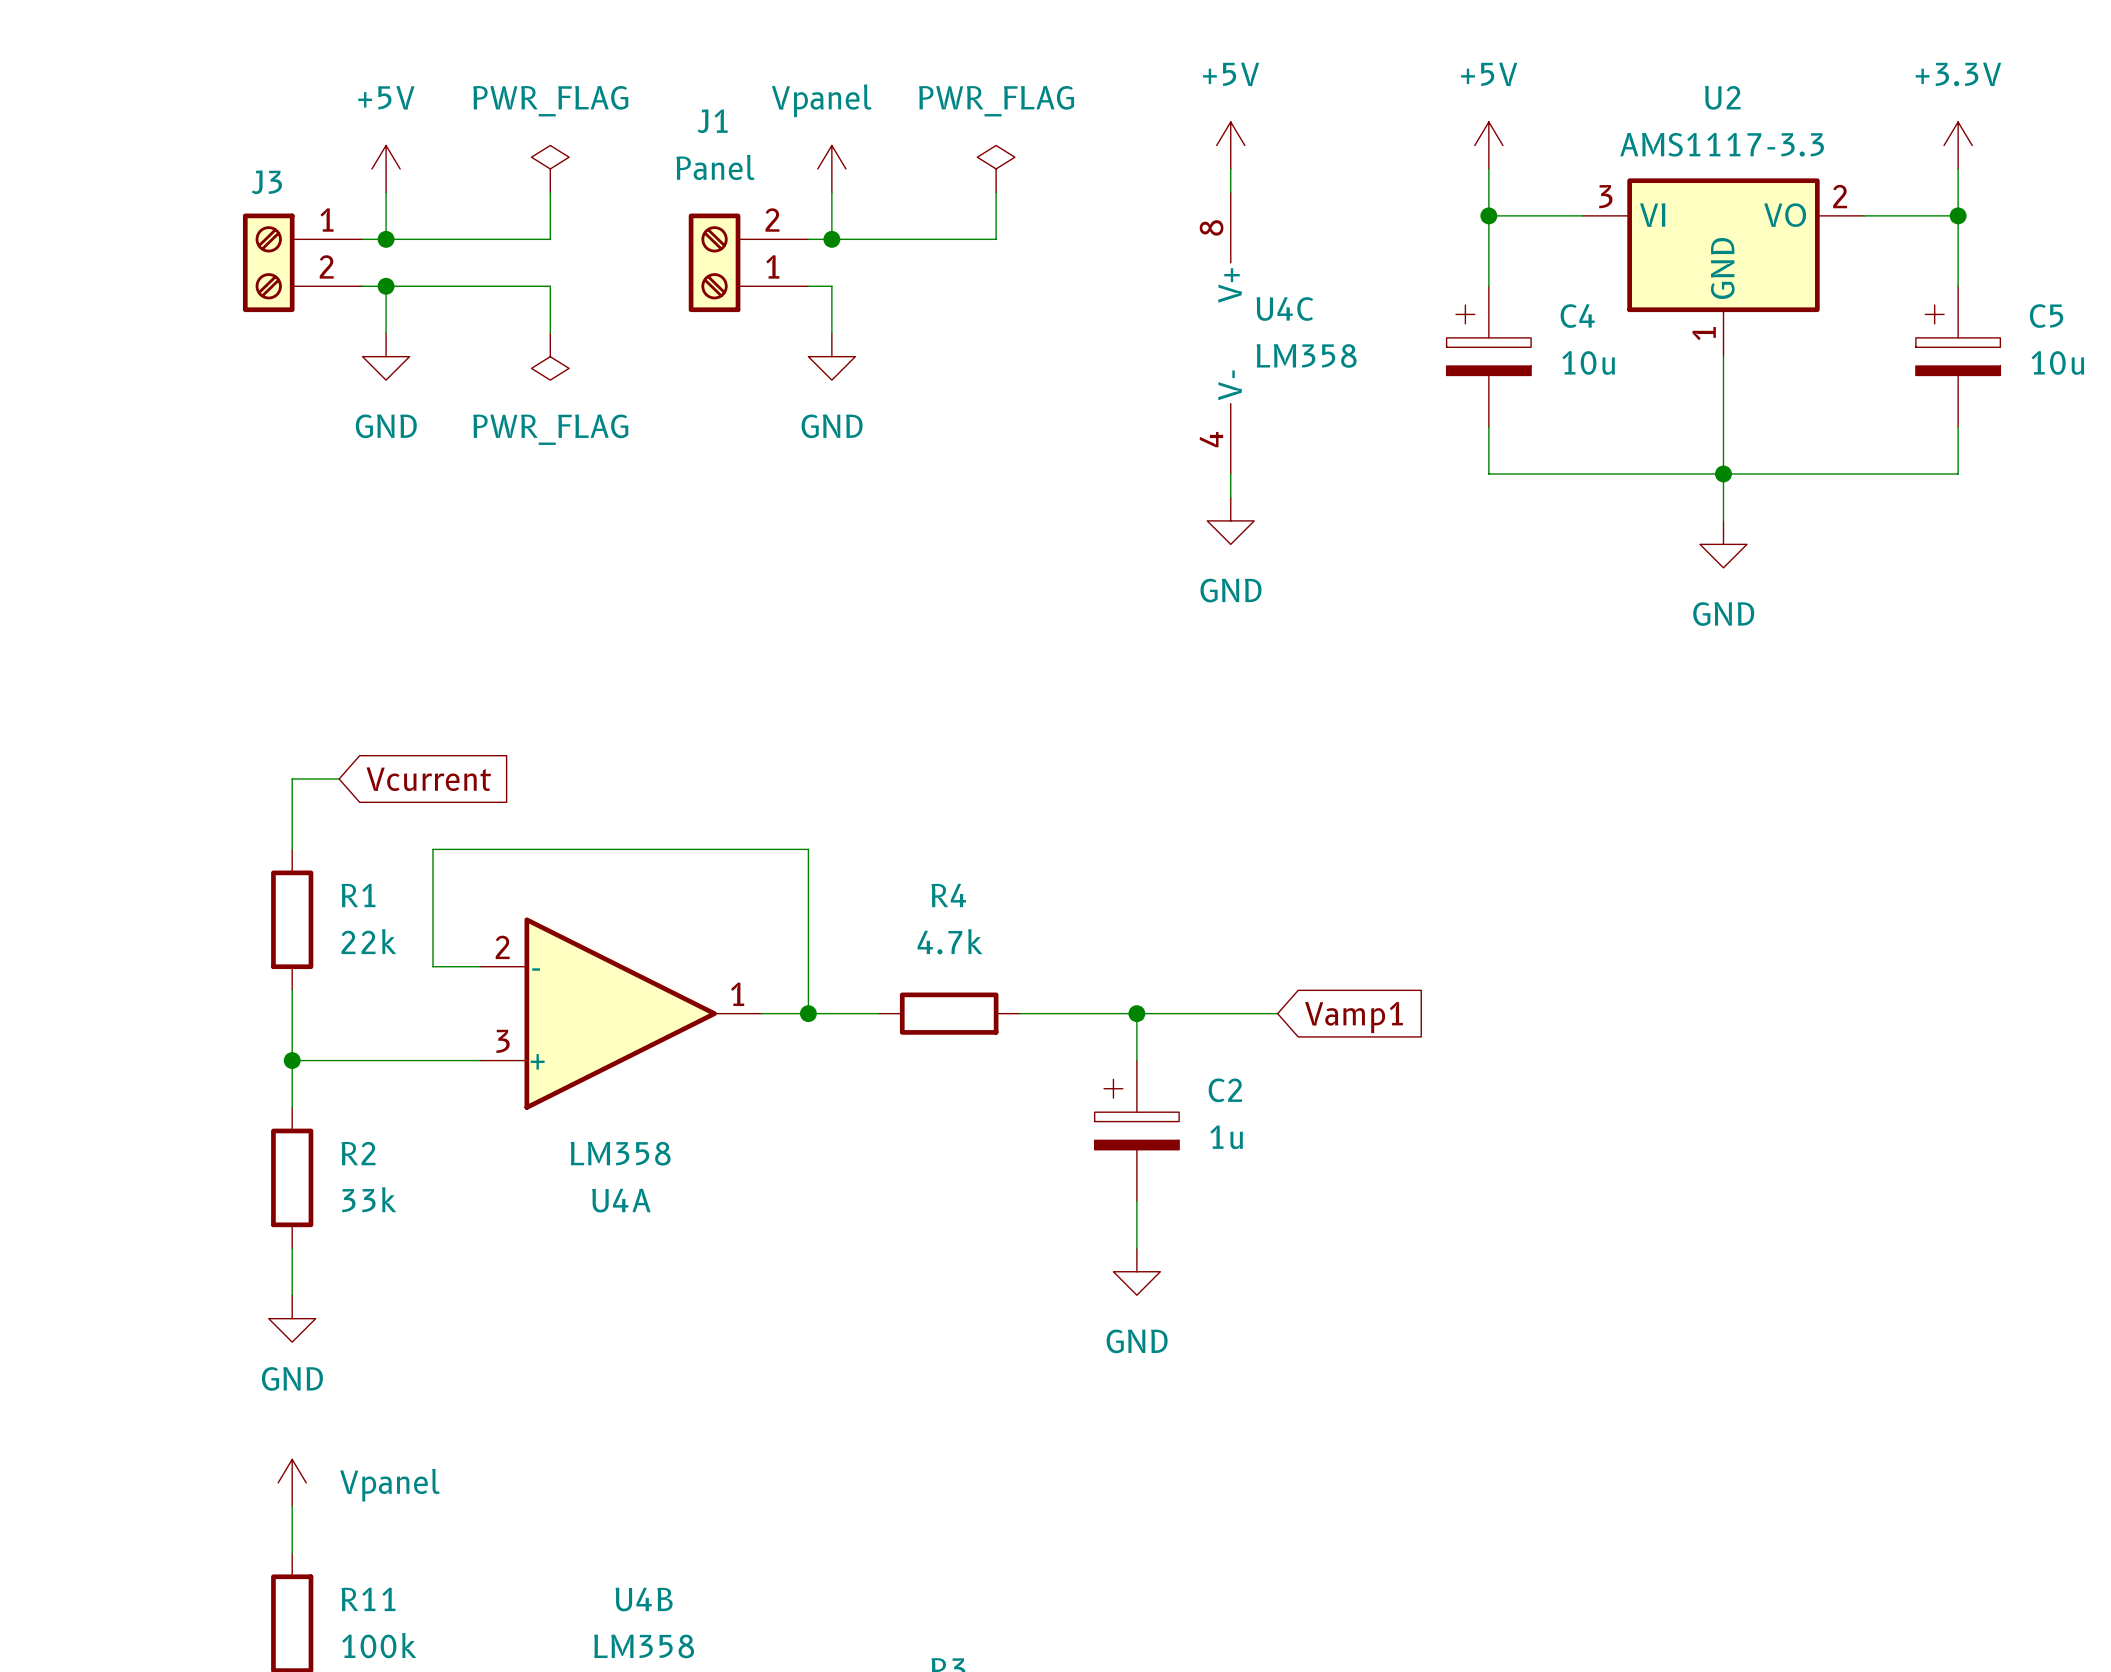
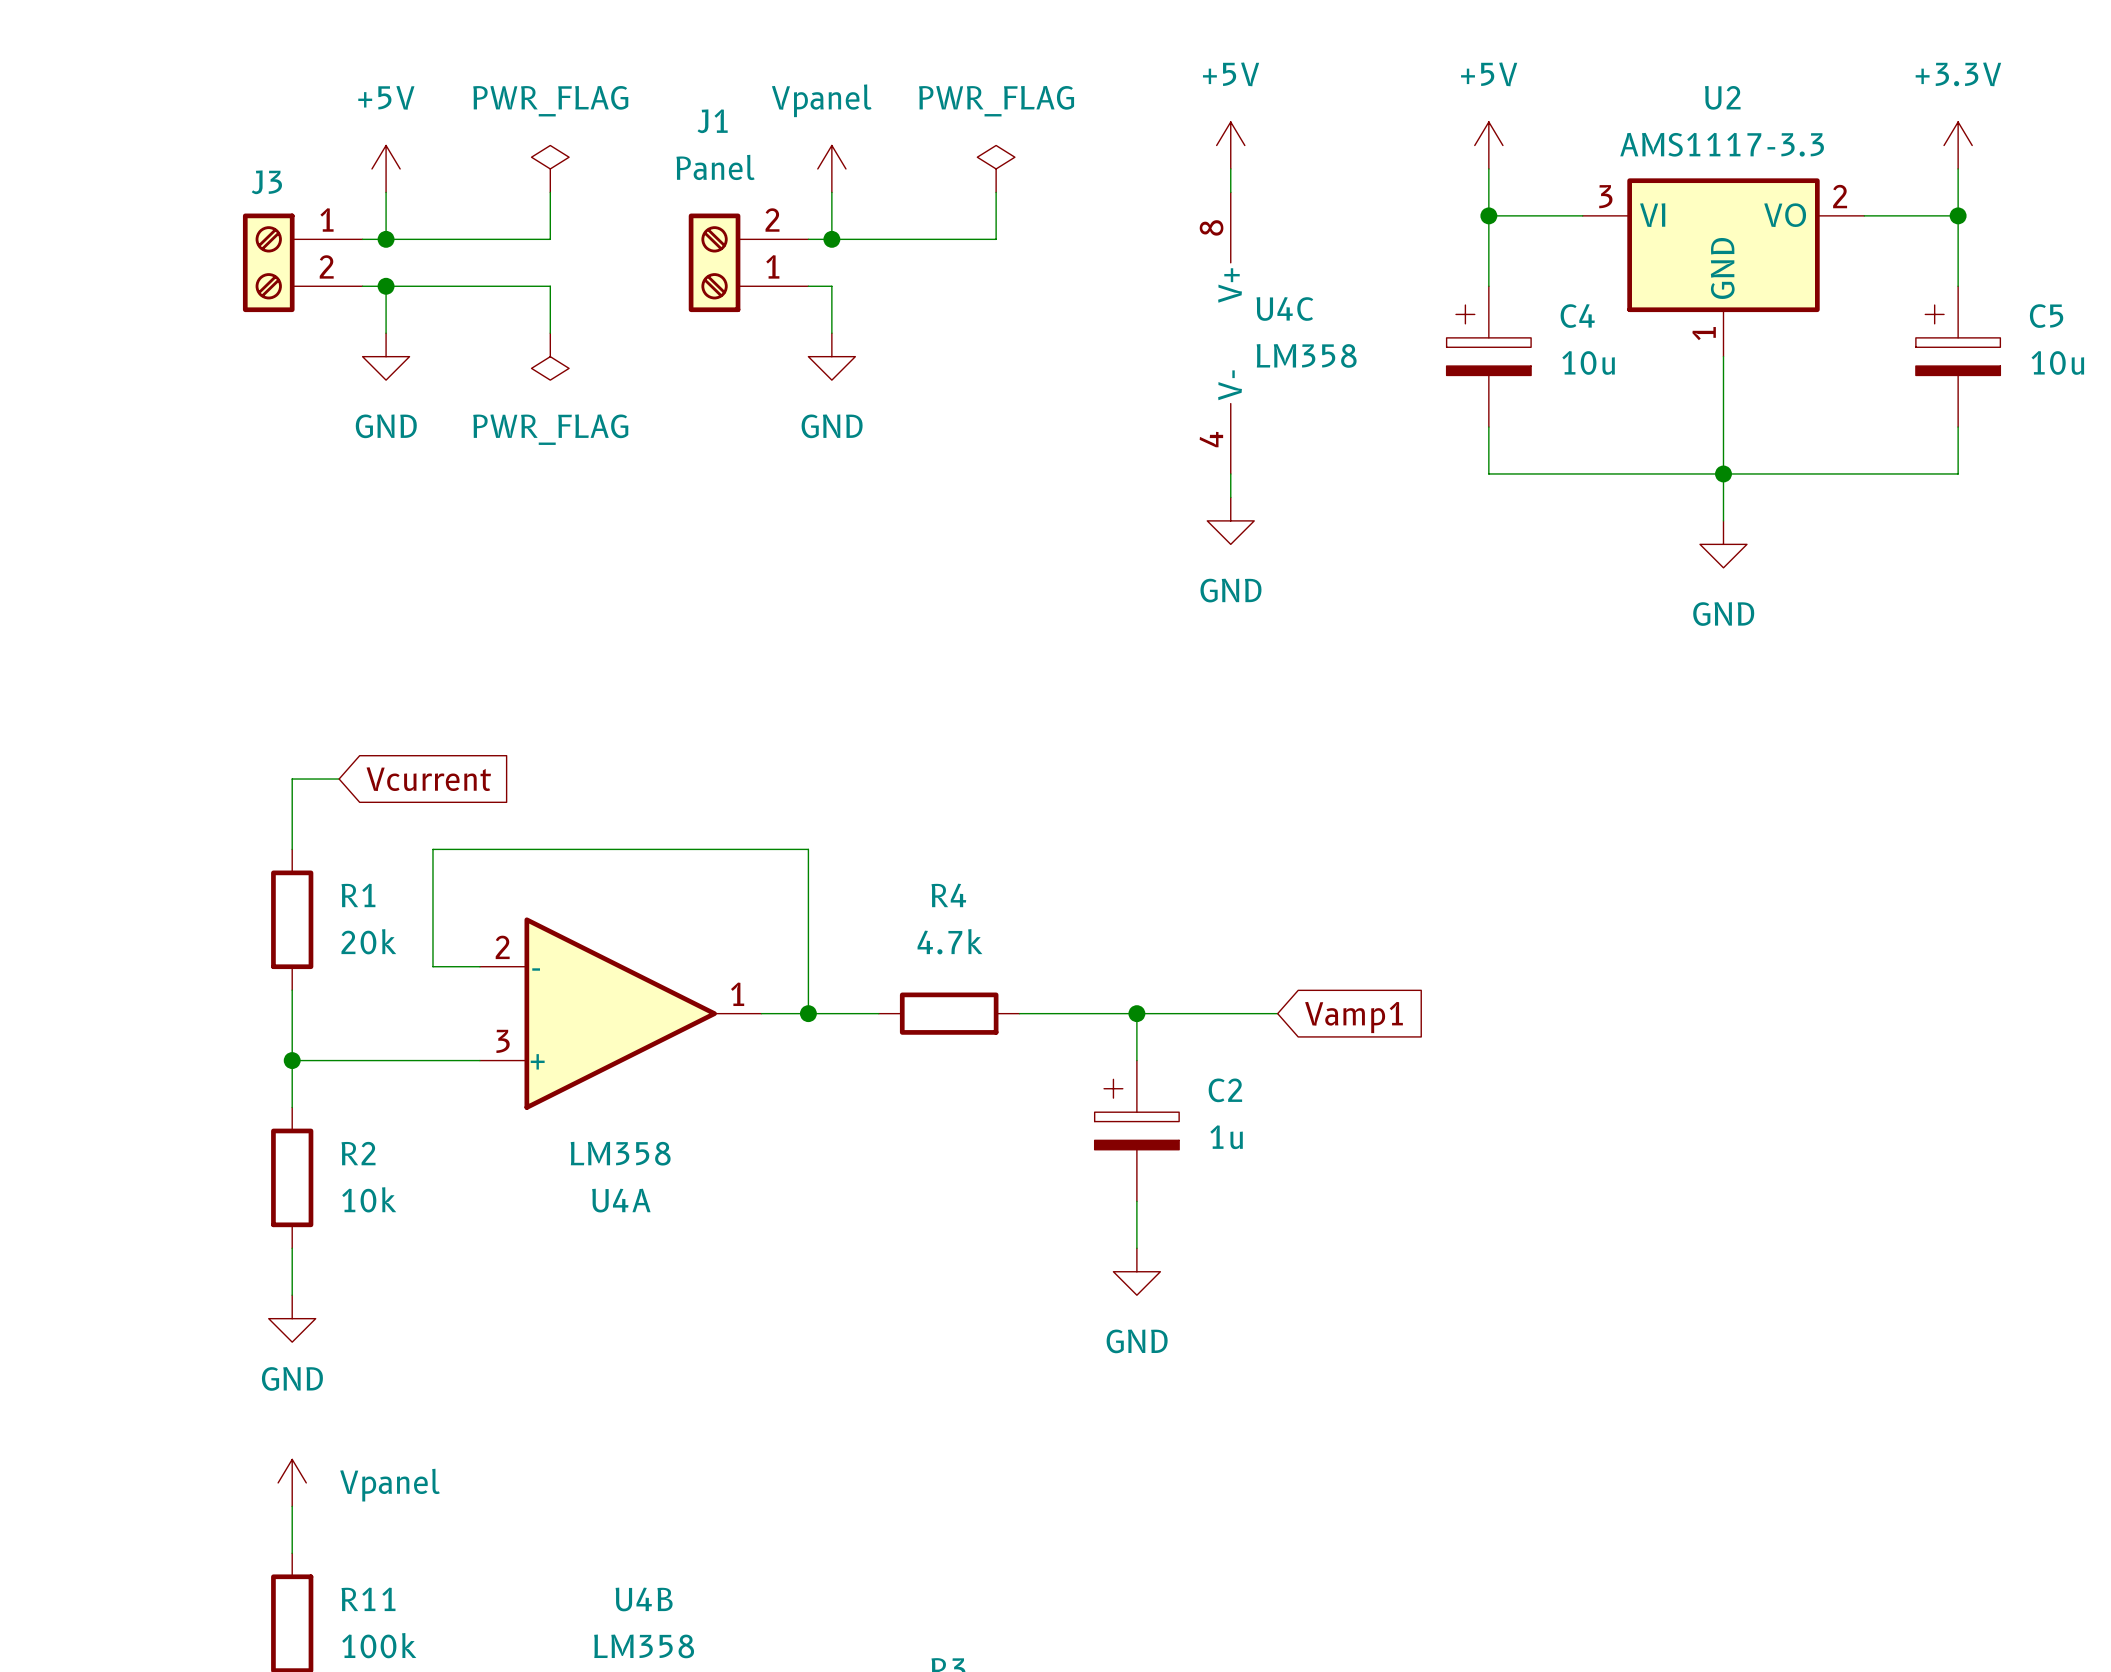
R1 value: 22k (368, 941) -> 20k (368, 941)
R2 value: 33k (369, 1199) -> 10k (369, 1199)

